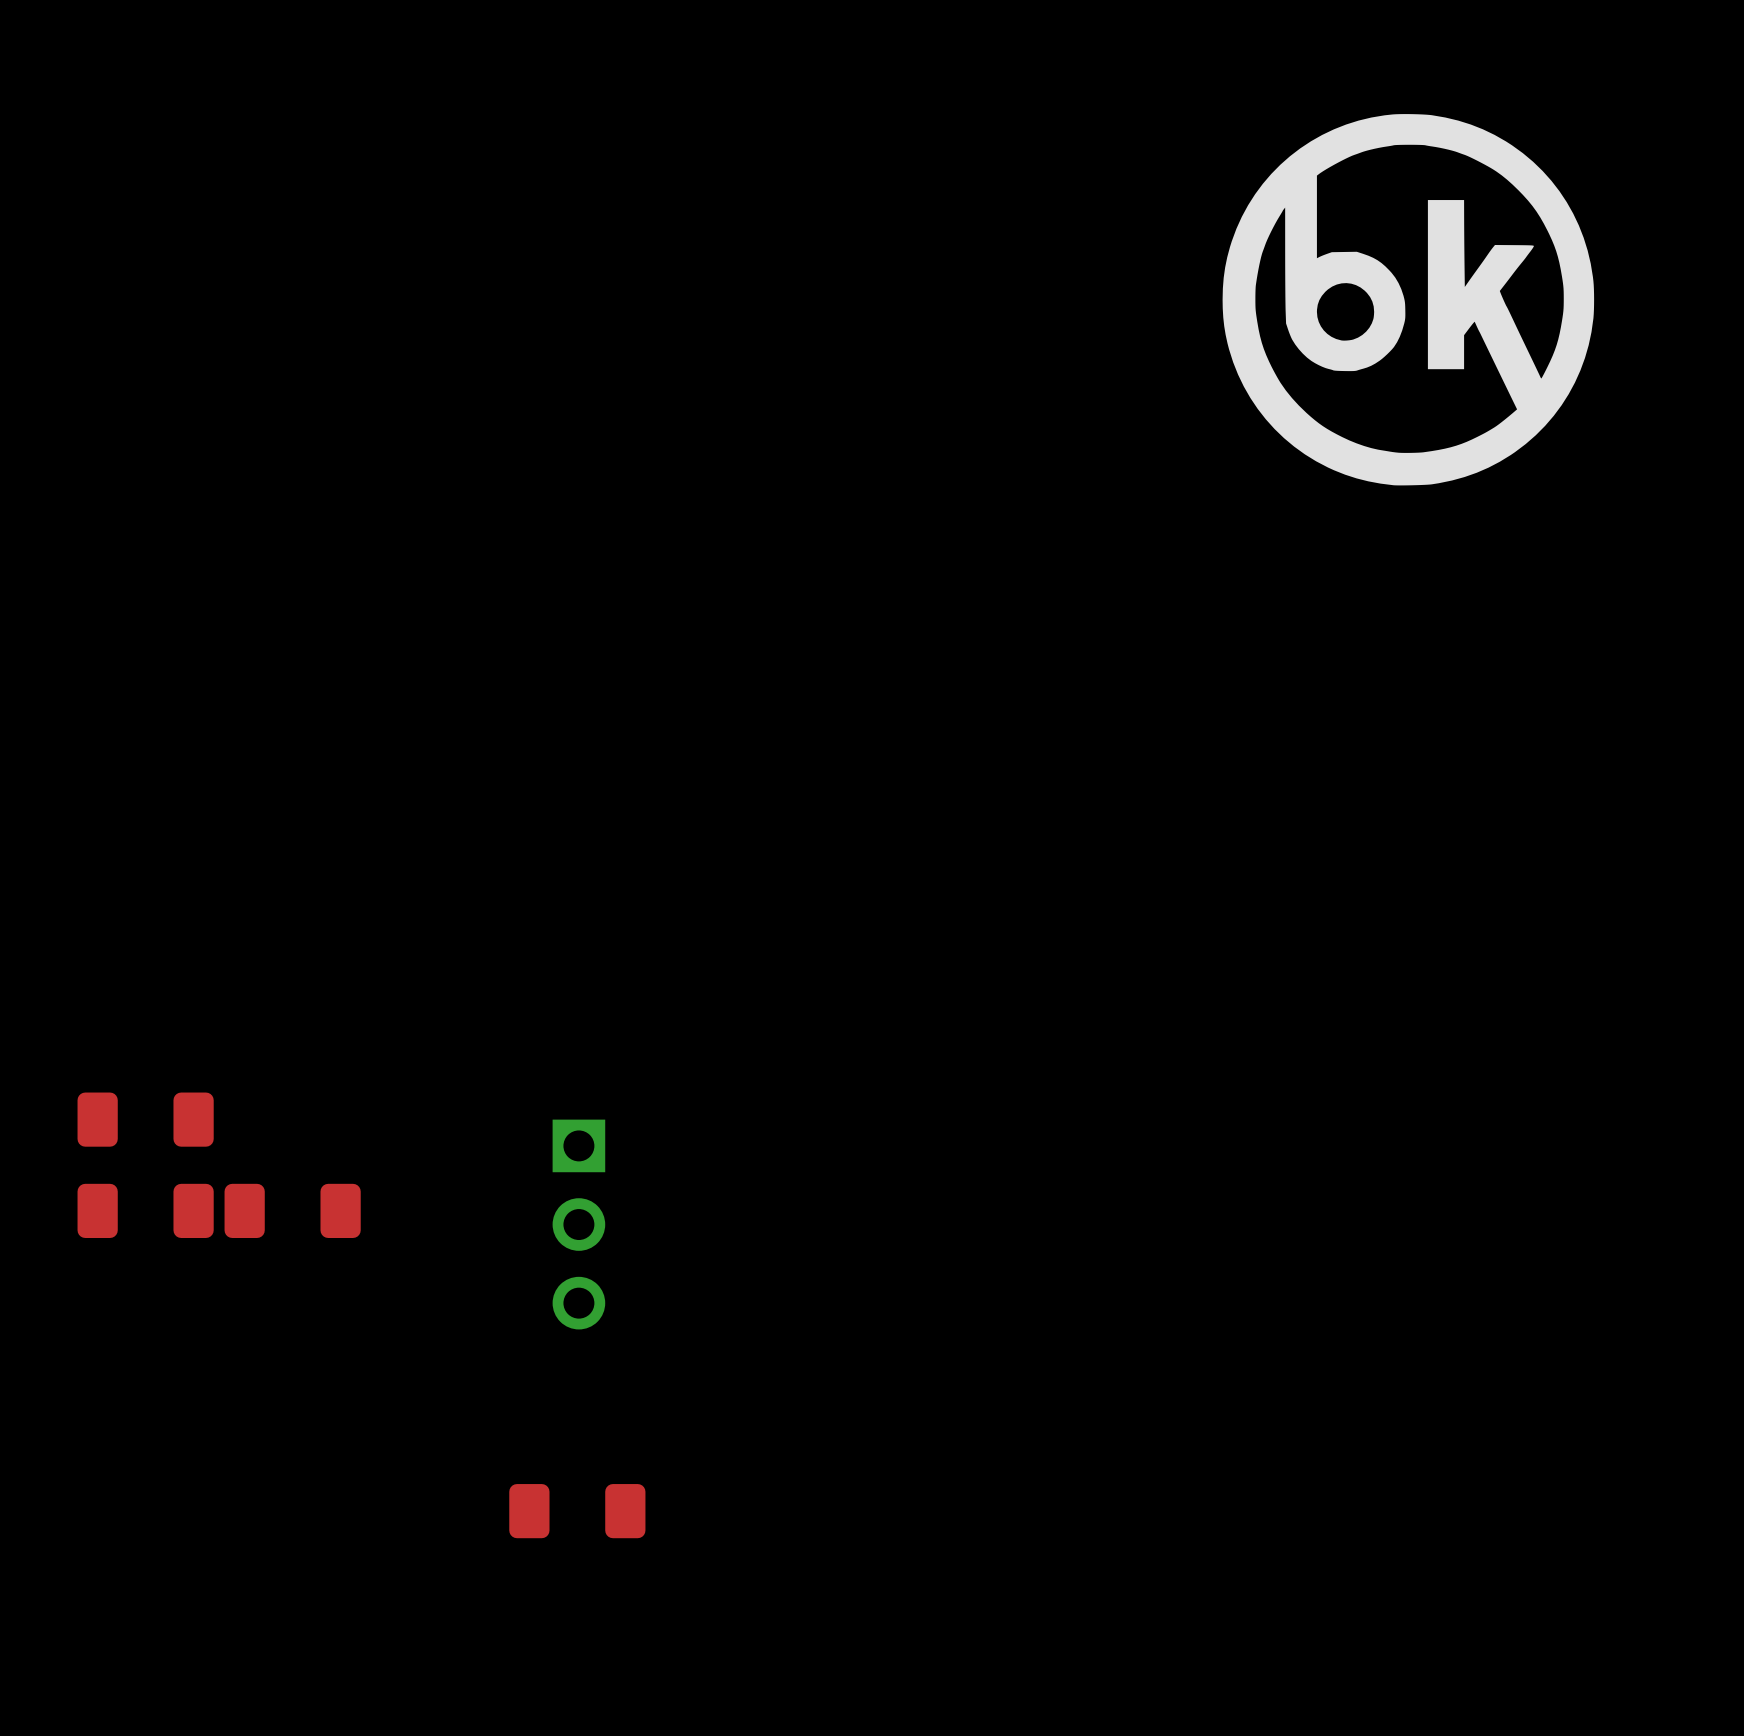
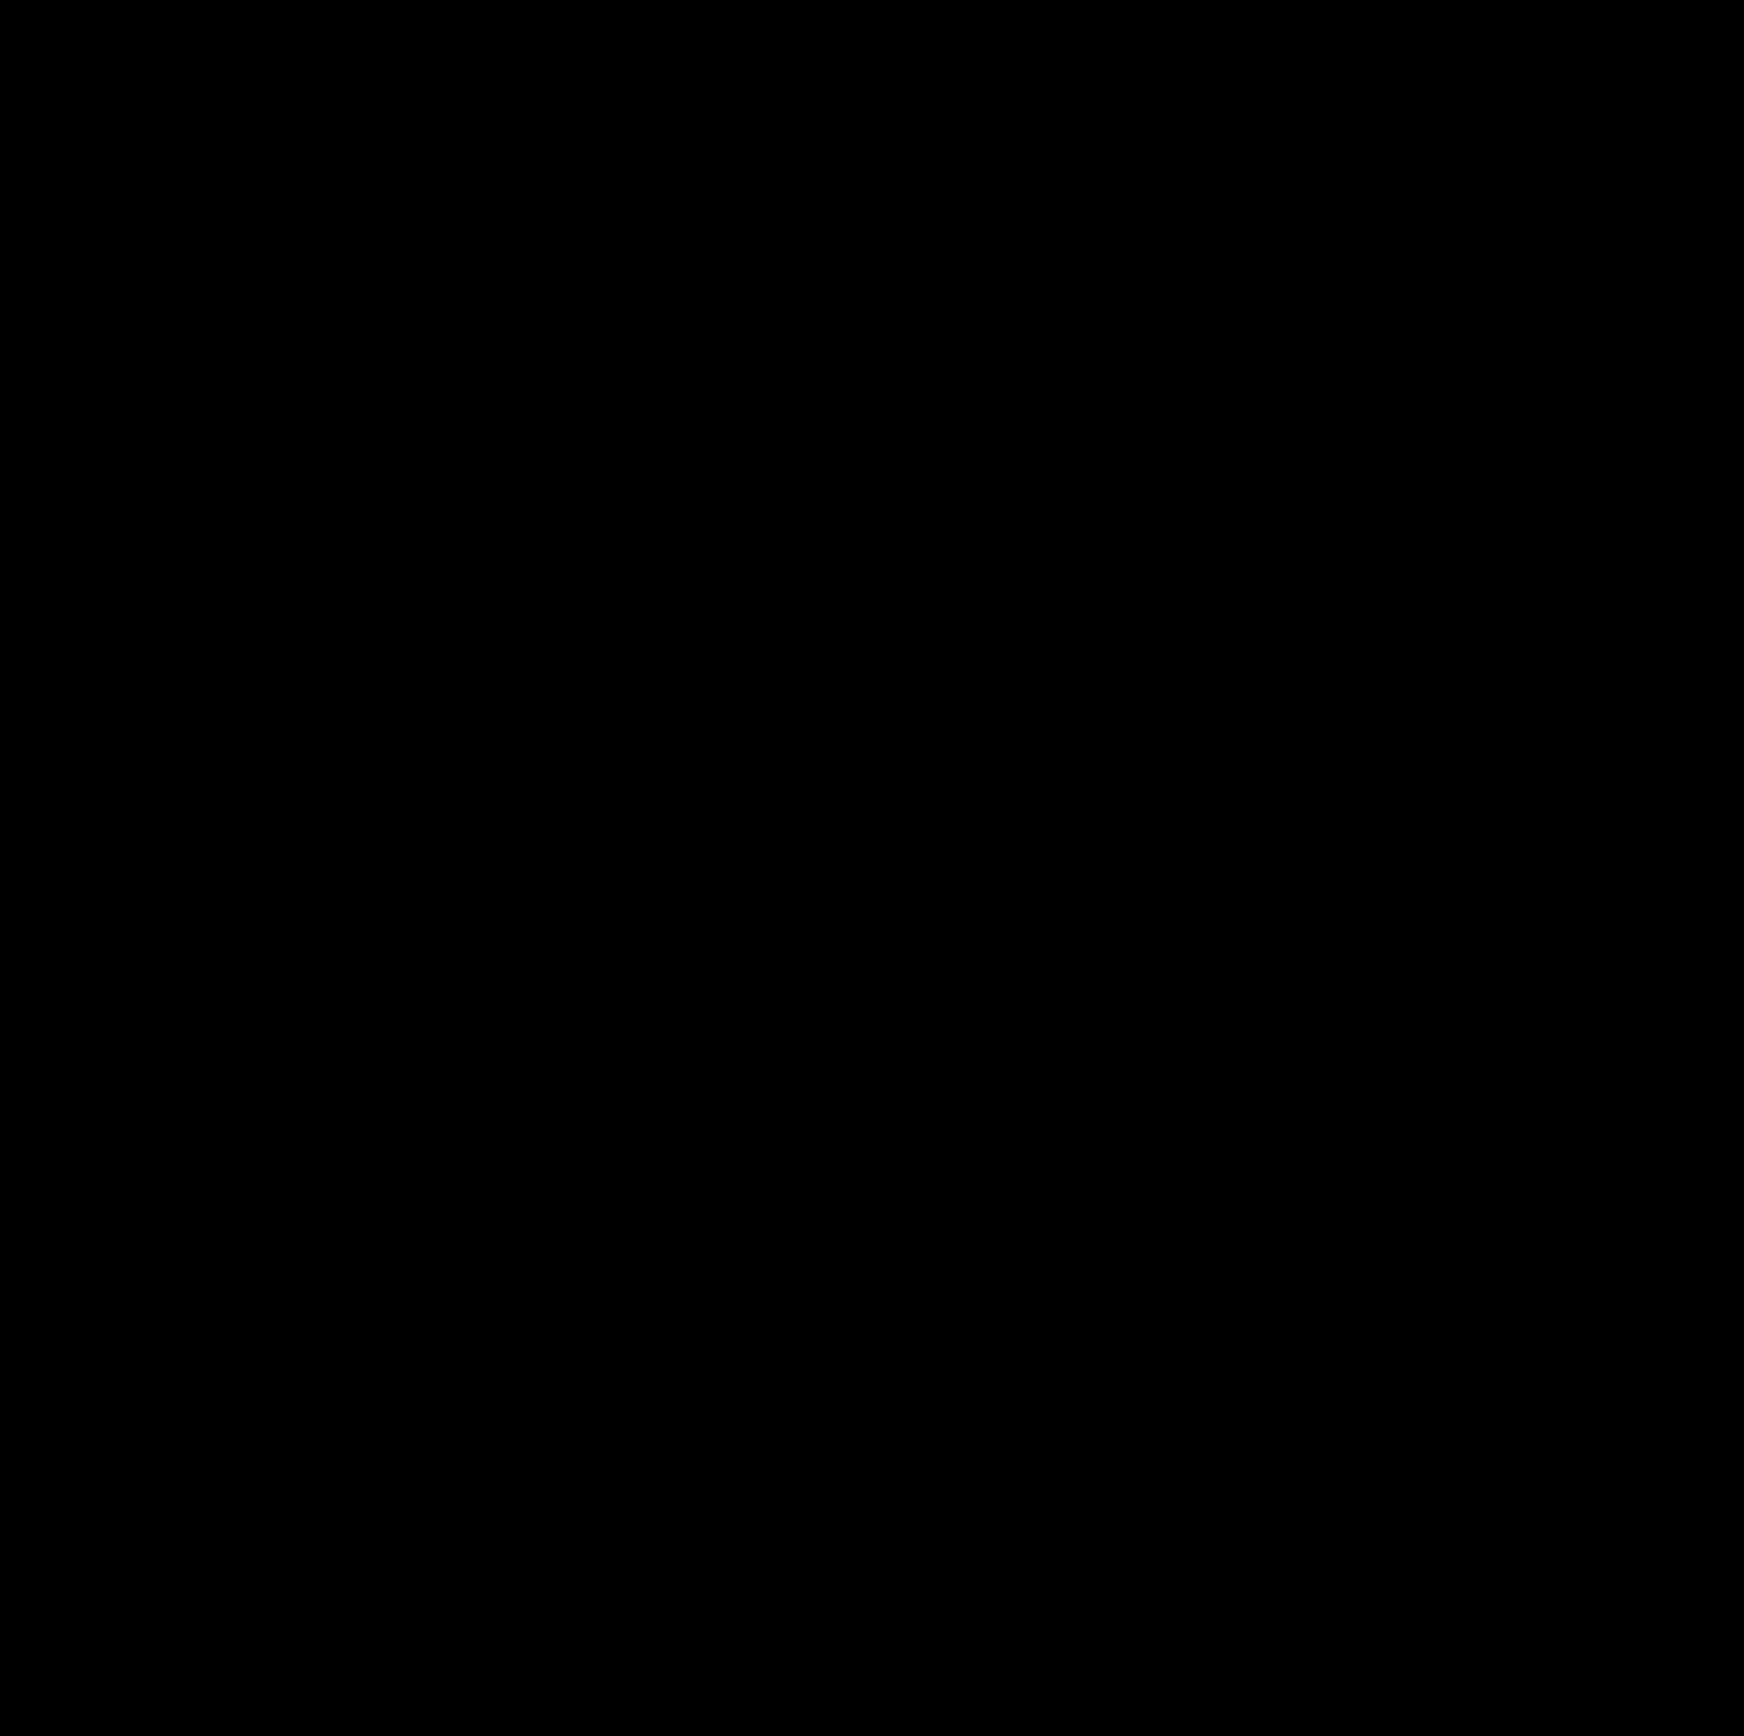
drawing: [1222, 114, 1595, 486] -> none
part: (145, 1119) -> none
part: (145, 1210) -> none
part: (292, 1210) -> none
part: (578, 1224) -> none
part: (577, 1511) -> none

